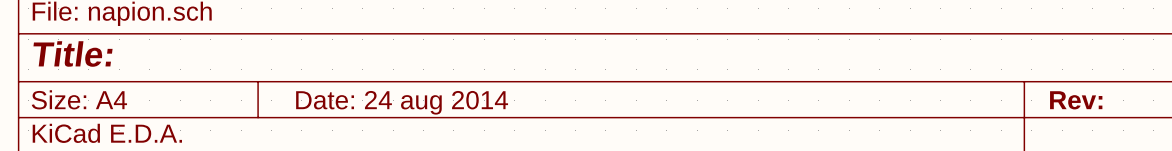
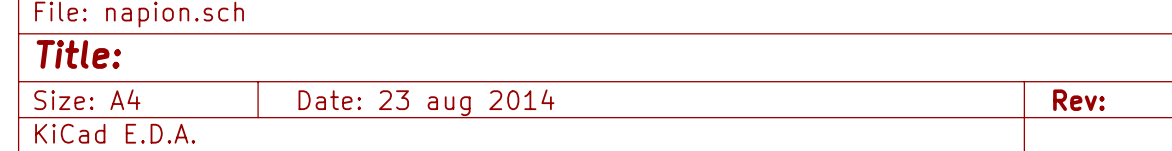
title block: Date: 24 aug 2014 (402, 102) -> Date: 23 aug 2014 (426, 102)

